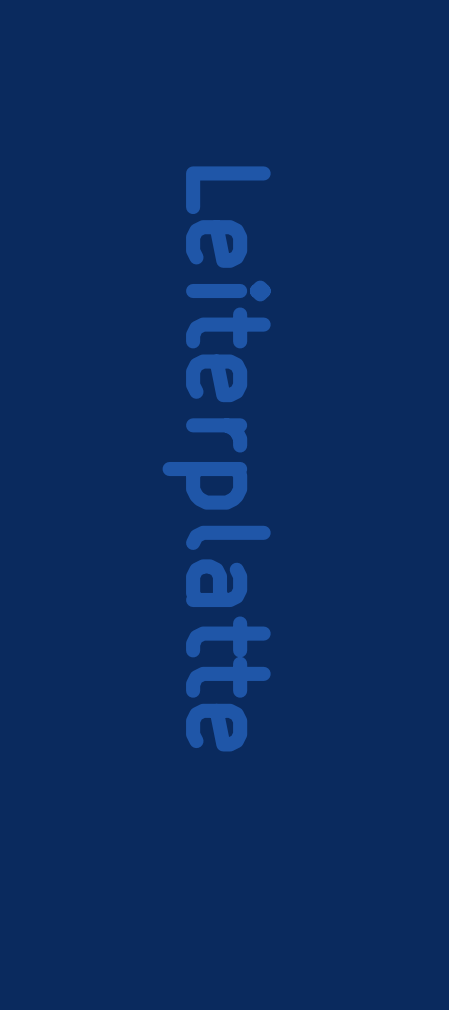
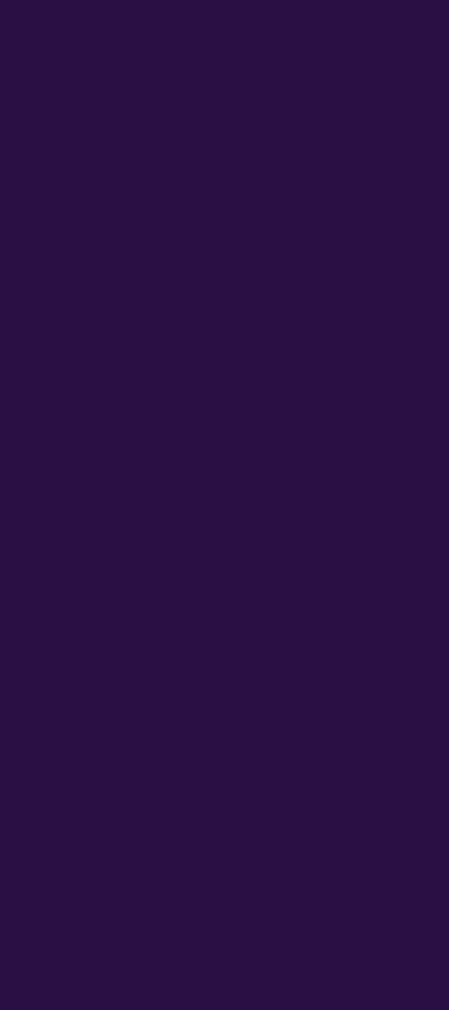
text: Leiterplatte (216, 458) -> none

